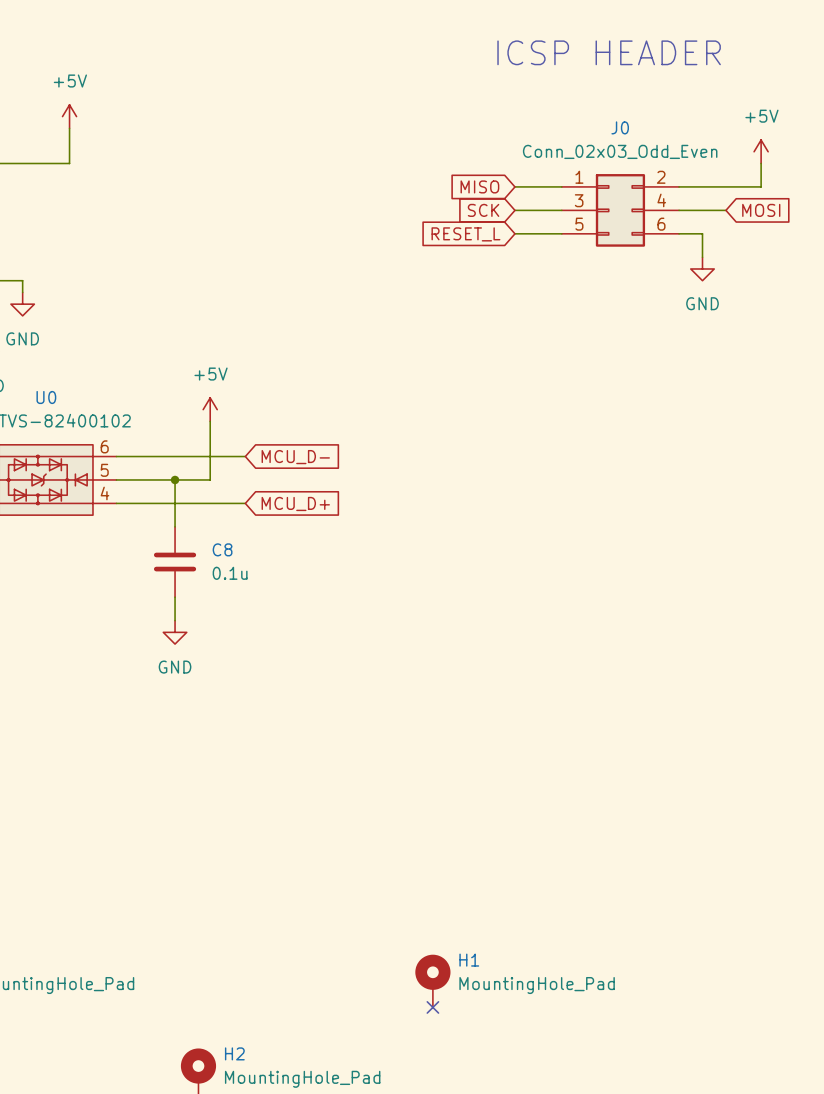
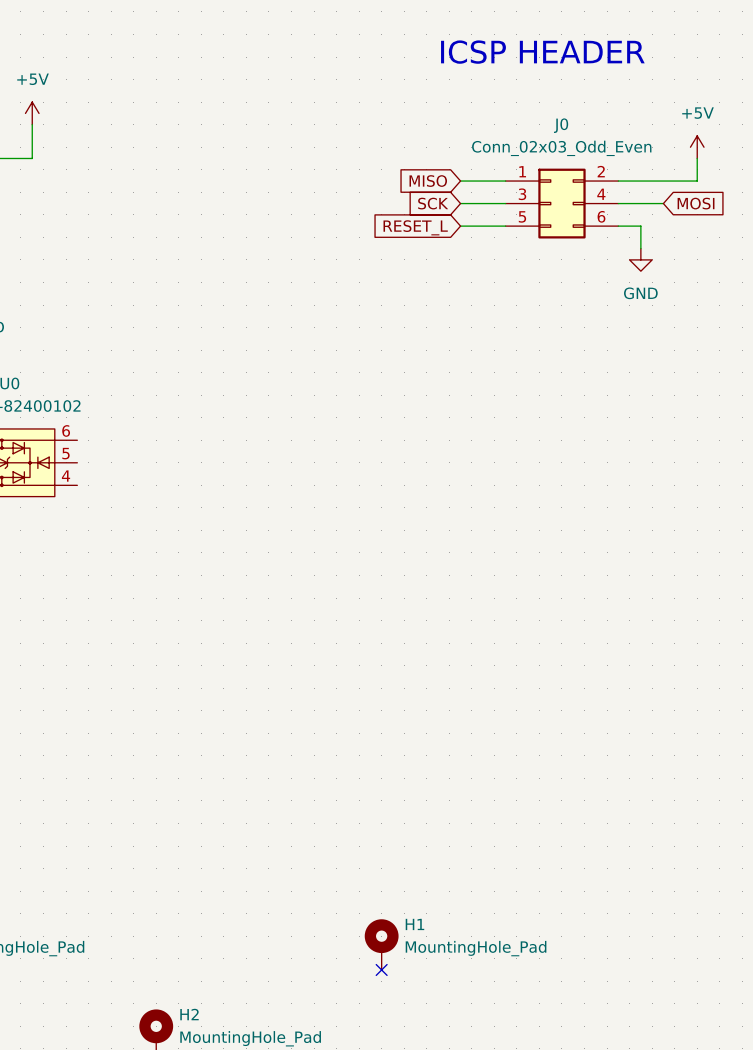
power symbol: +5V (210, 409) -> none
wire: (210, 421) (210, 479) (116, 479) -> none
wire: (116, 456) (245, 456) -> none
global label: MCU_D- (295, 457) -> none
wire: (175, 479) (175, 526) -> none
junction: (175, 479) -> none
wire: (116, 503) (245, 503) -> none
global label: MCU_D+ (295, 503) -> none
C8: 0.1u (175, 562) -> none
wire: (175, 597) (175, 620) -> none
power symbol: GND (175, 632) -> none

